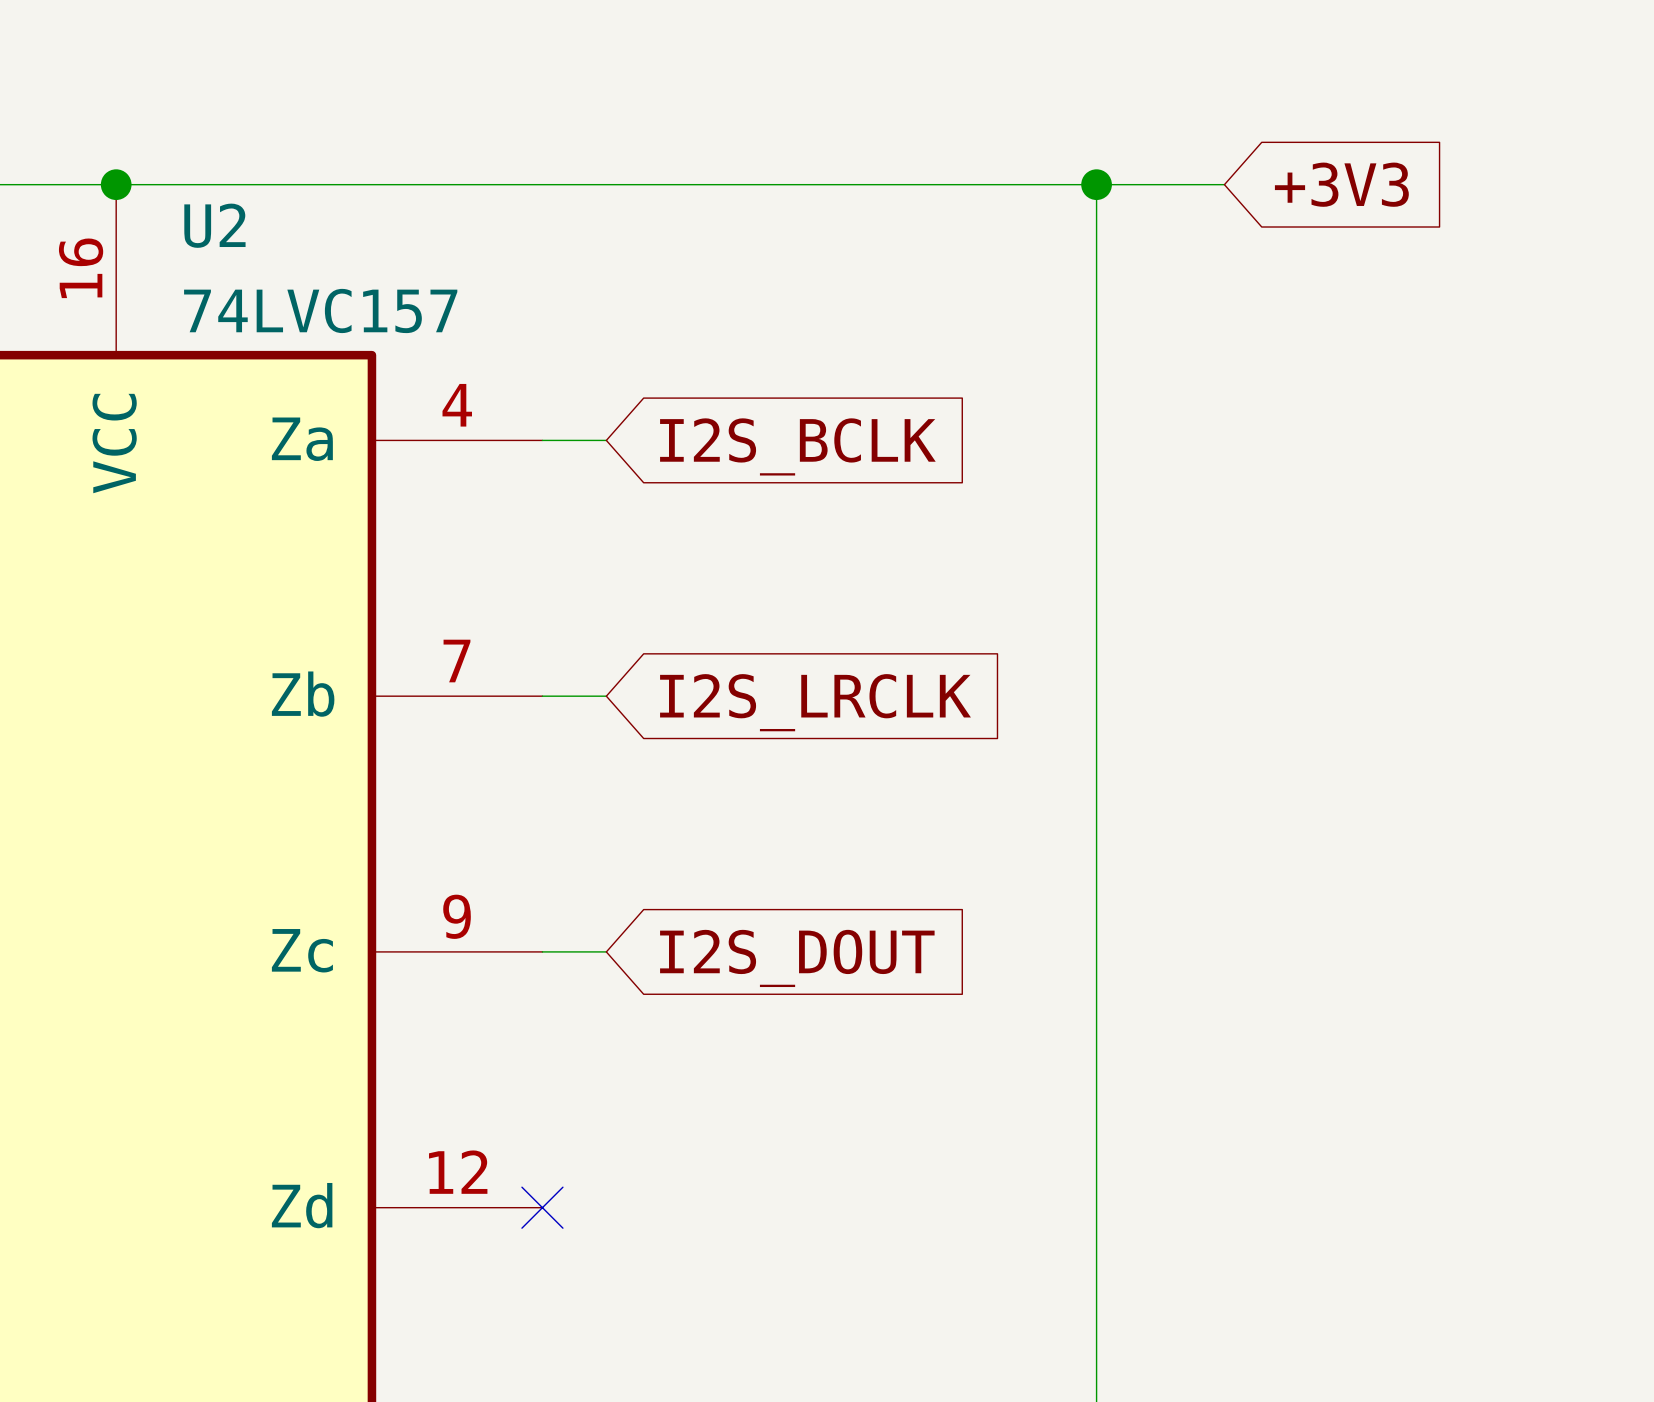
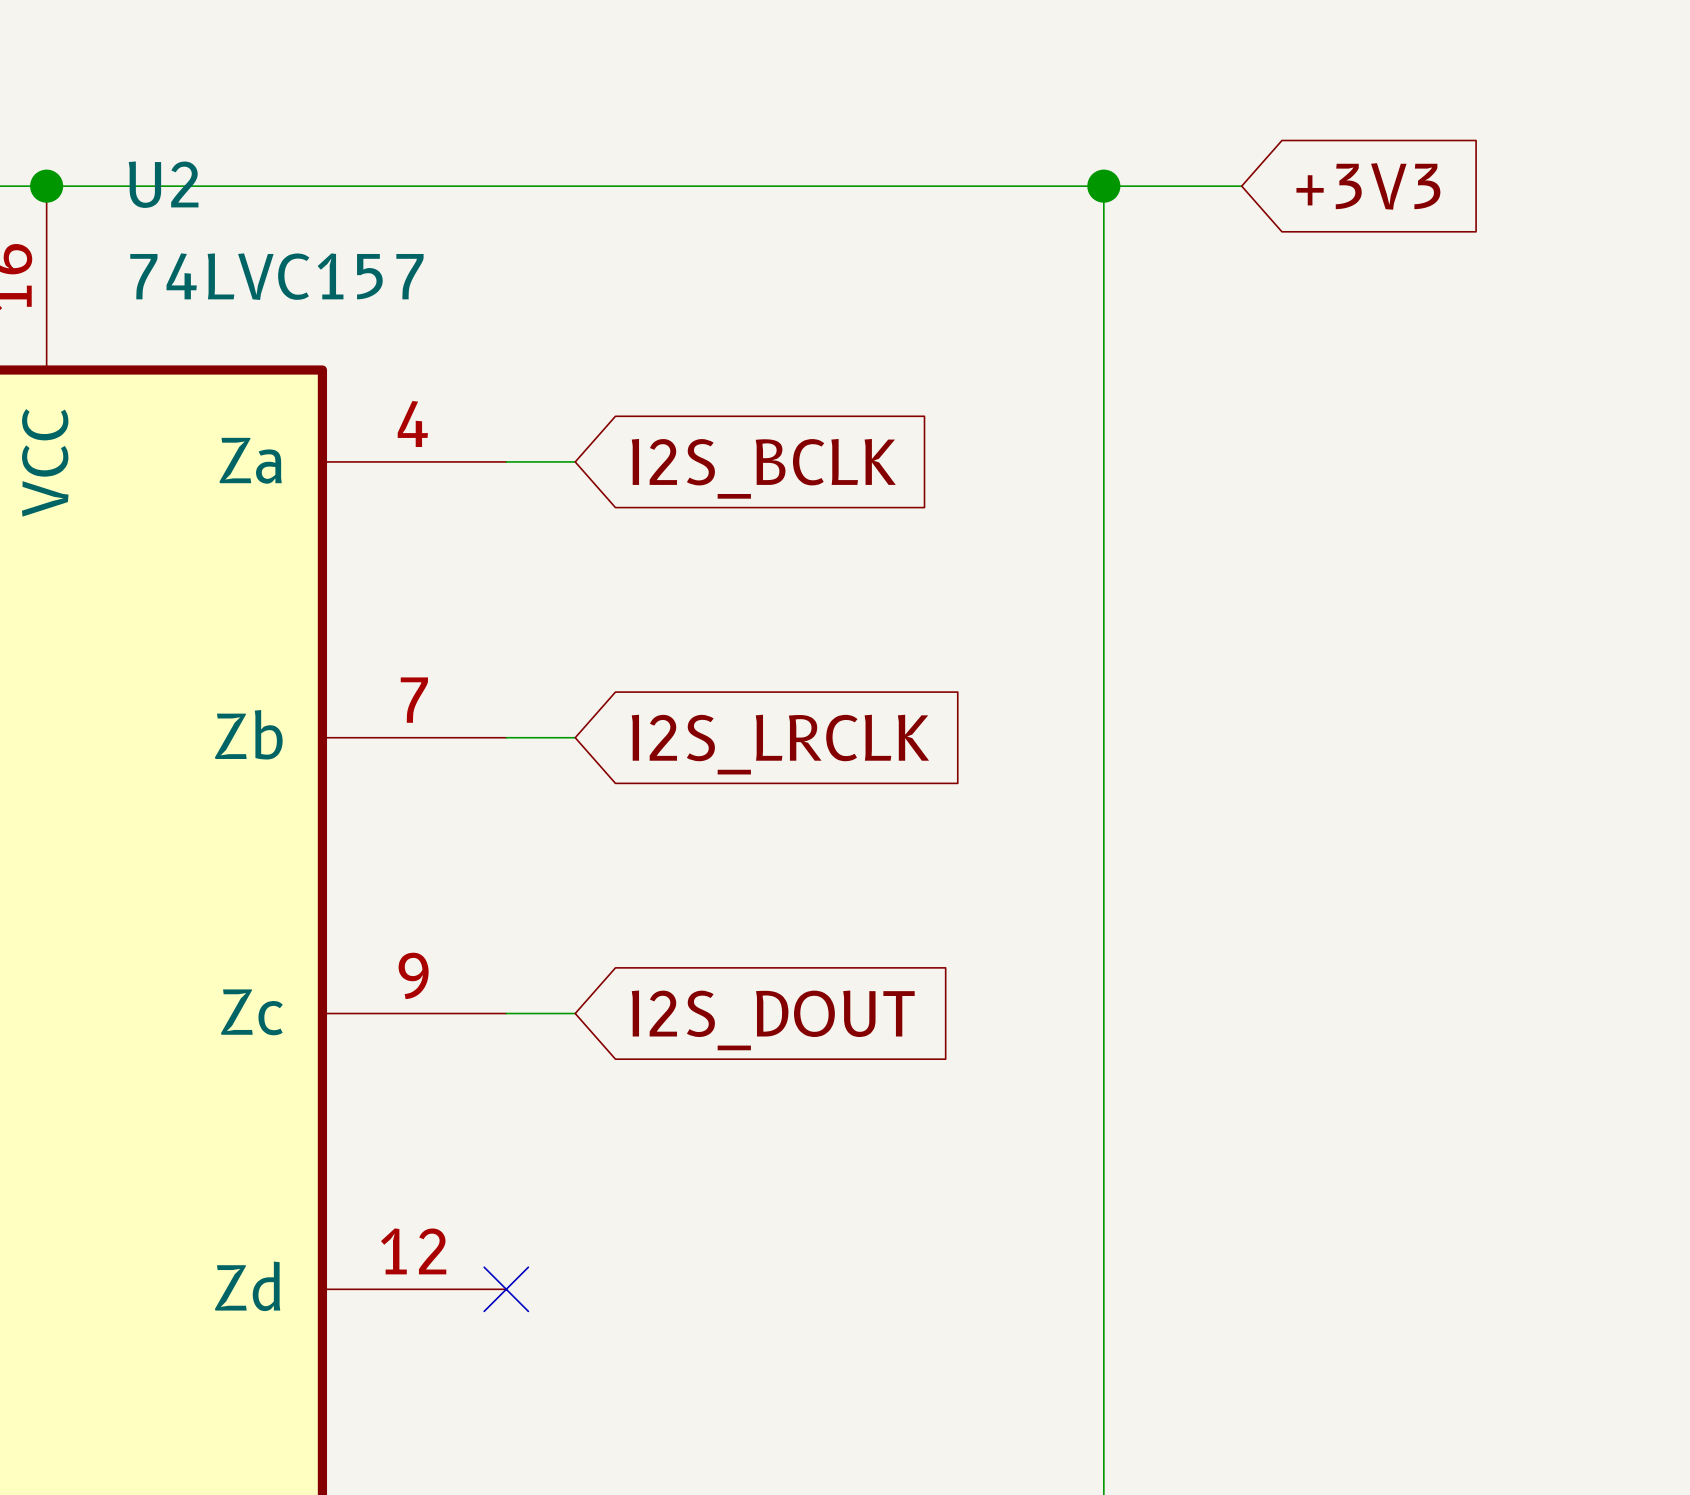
U2 name position: U2 (214, 225) -> U2 (163, 184)
U2 value position: 74LVC157 (320, 310) -> 74LVC157 (276, 276)

